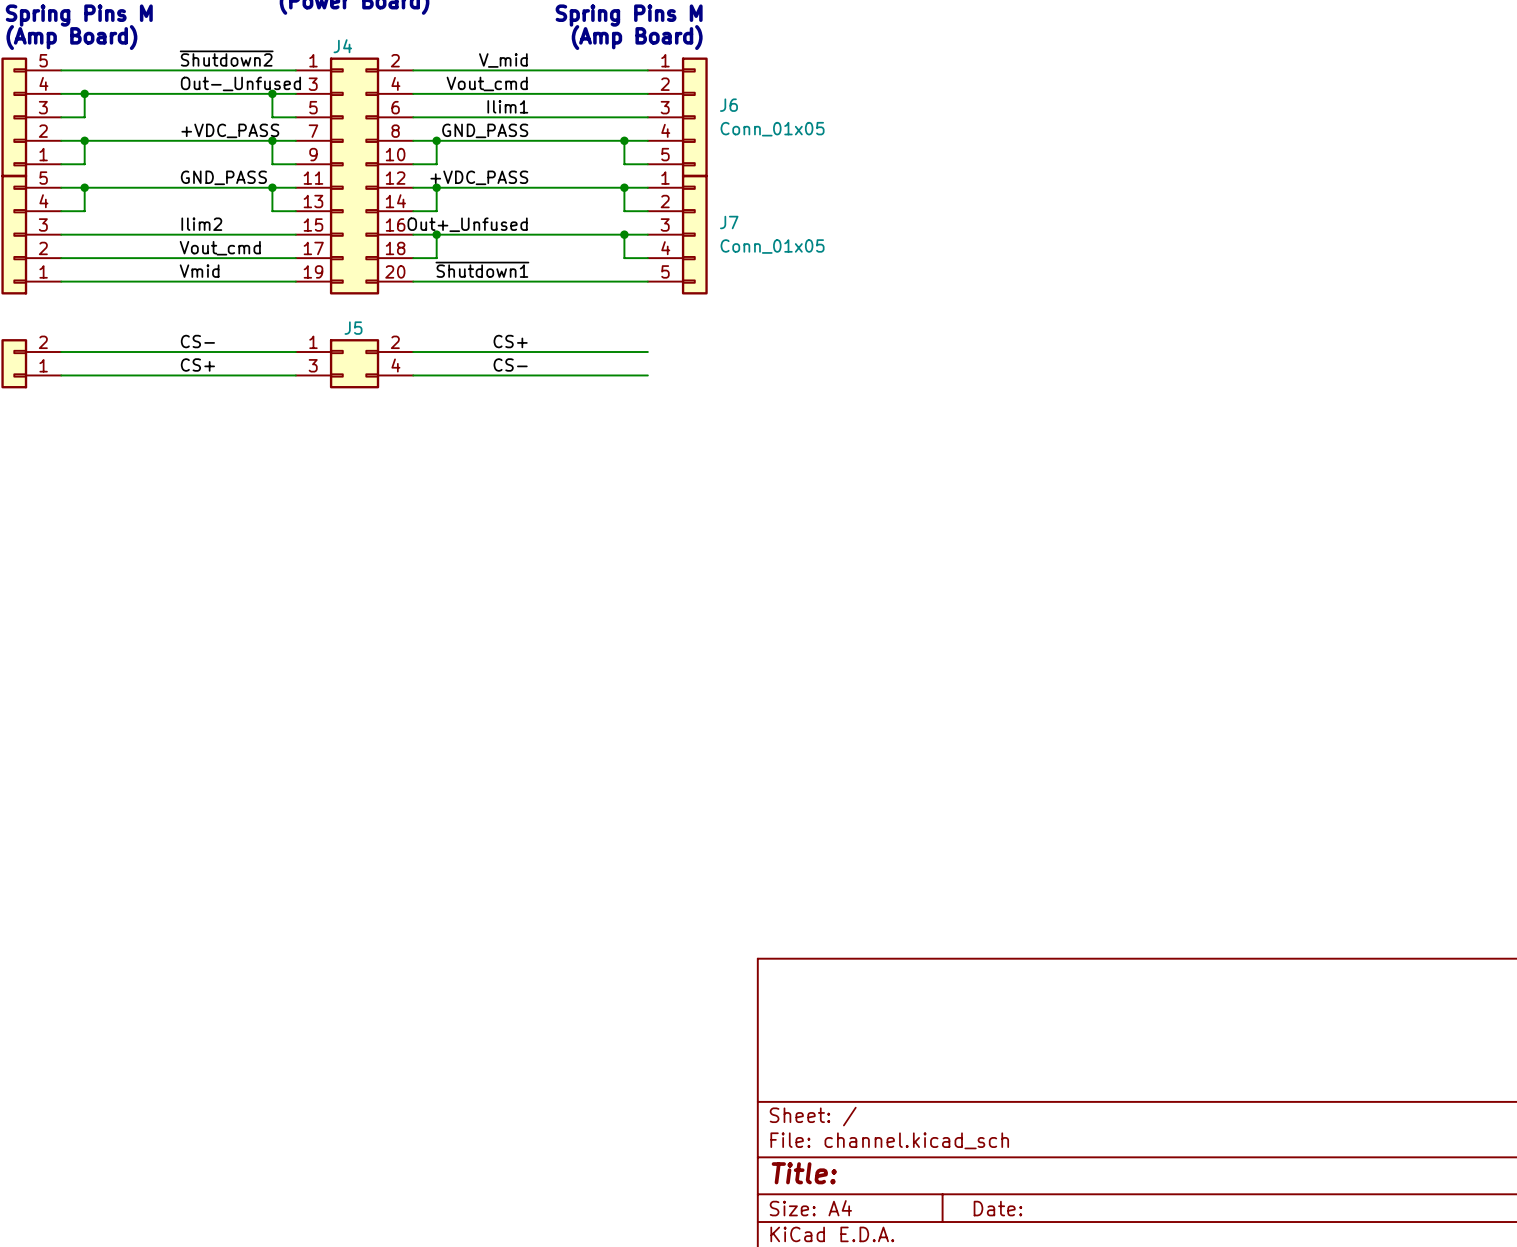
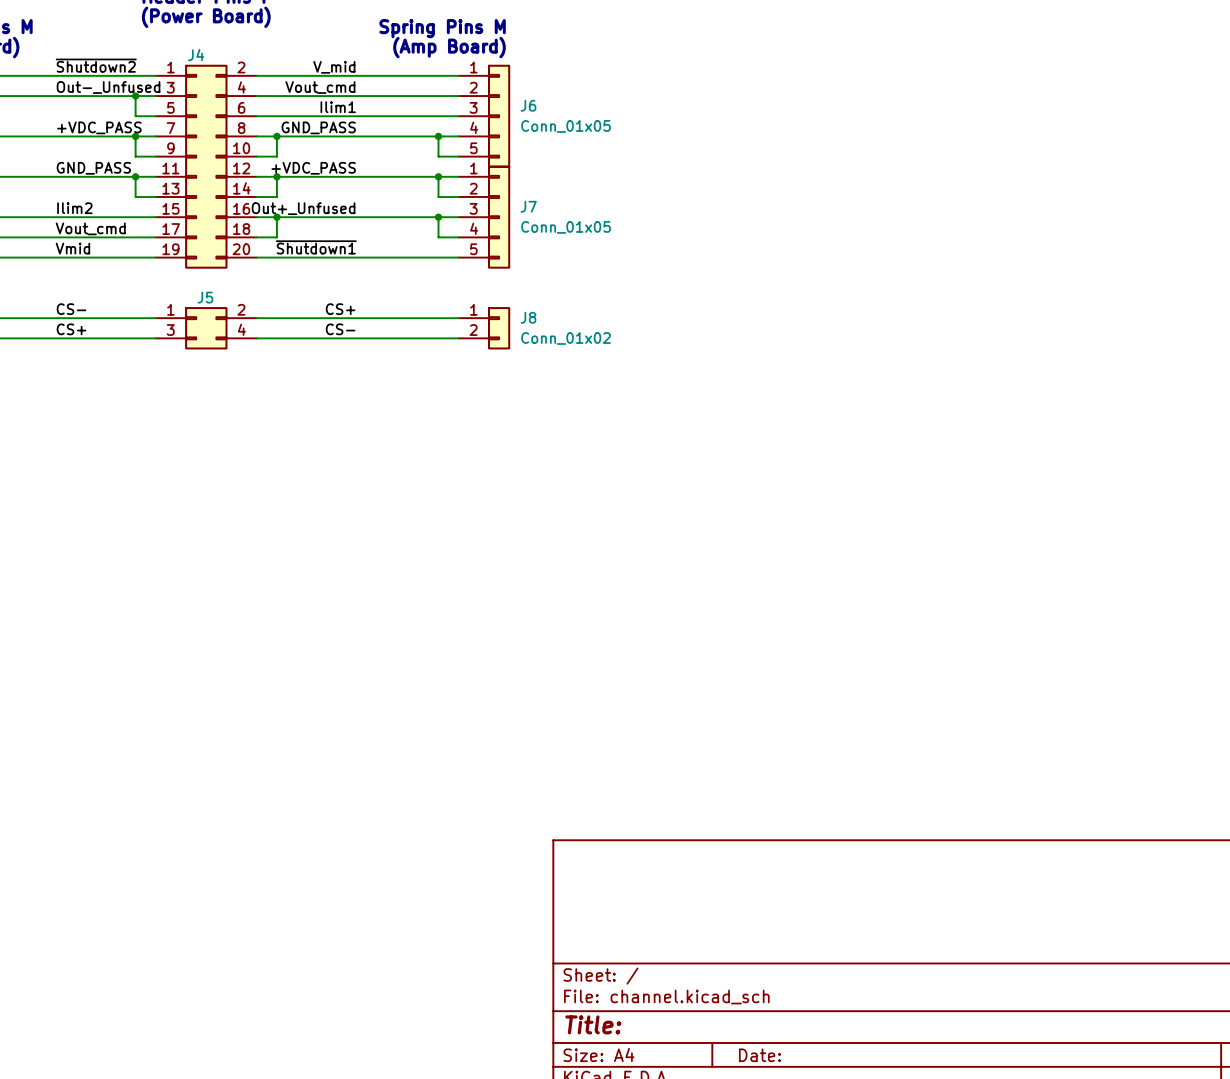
J8: none -> Conn_01x02 (484, 328)

